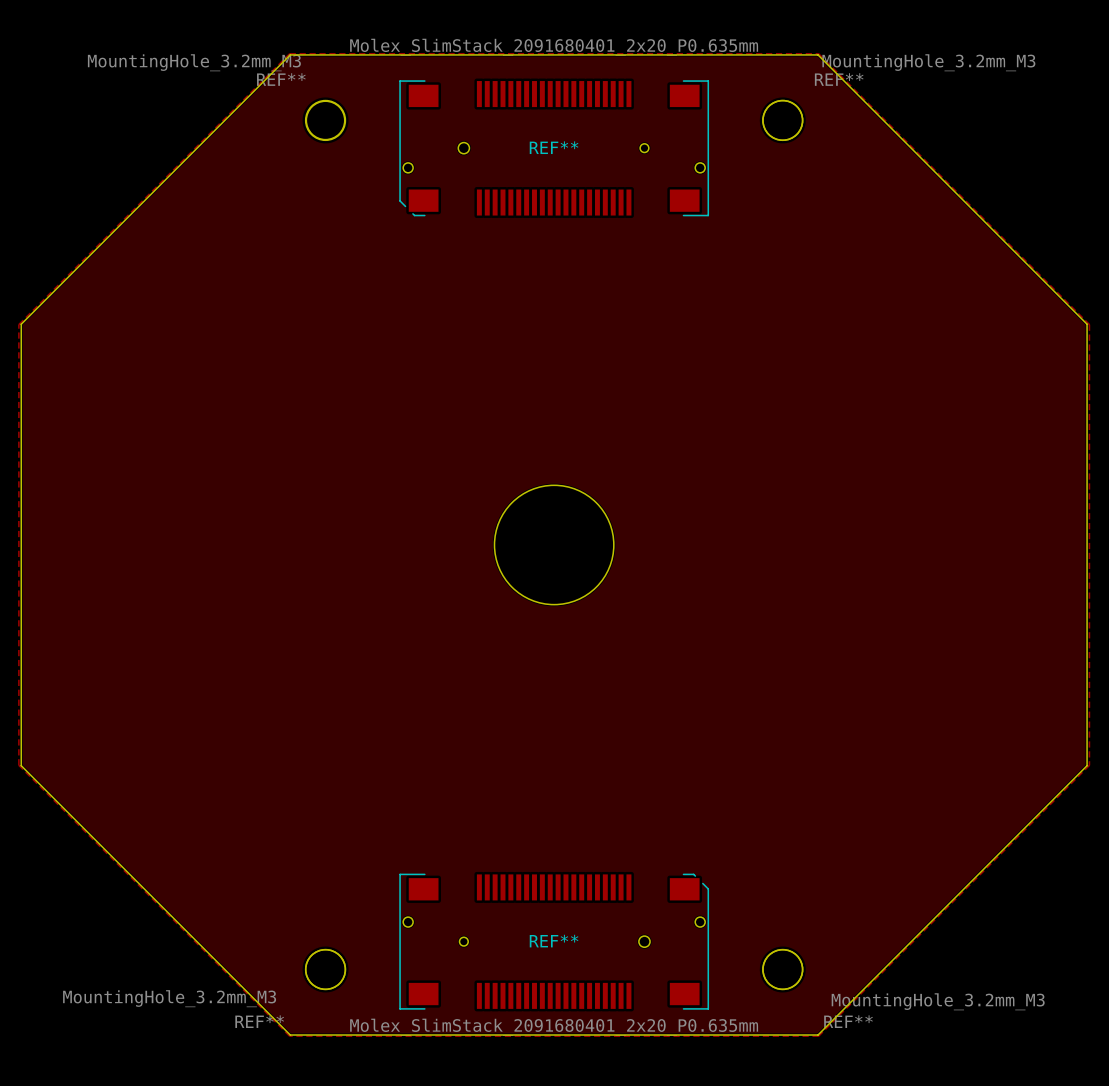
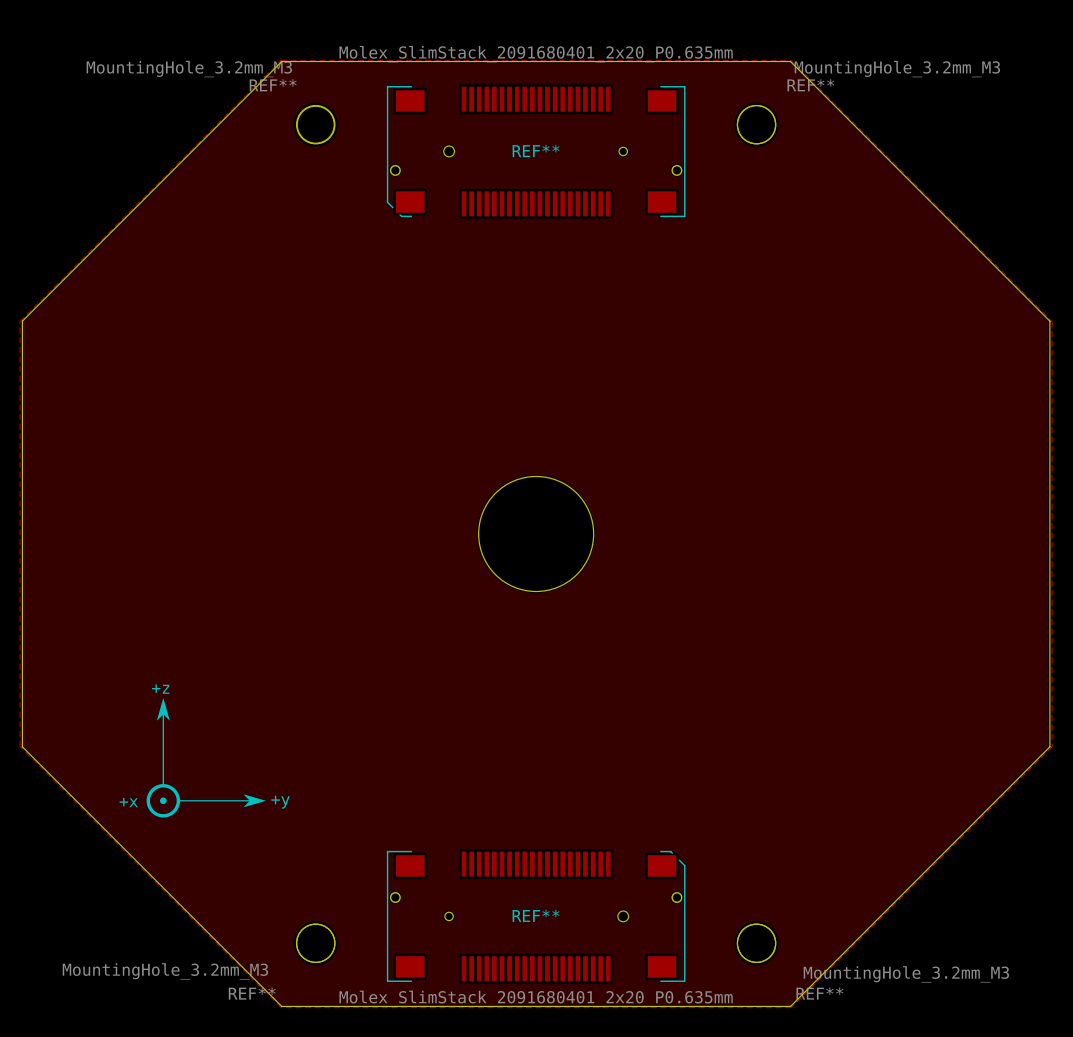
text: none -> +z (160, 689)
drawing: none -> [146, 698, 266, 818]
text: none -> +x (128, 802)
text: none -> +y (280, 802)

